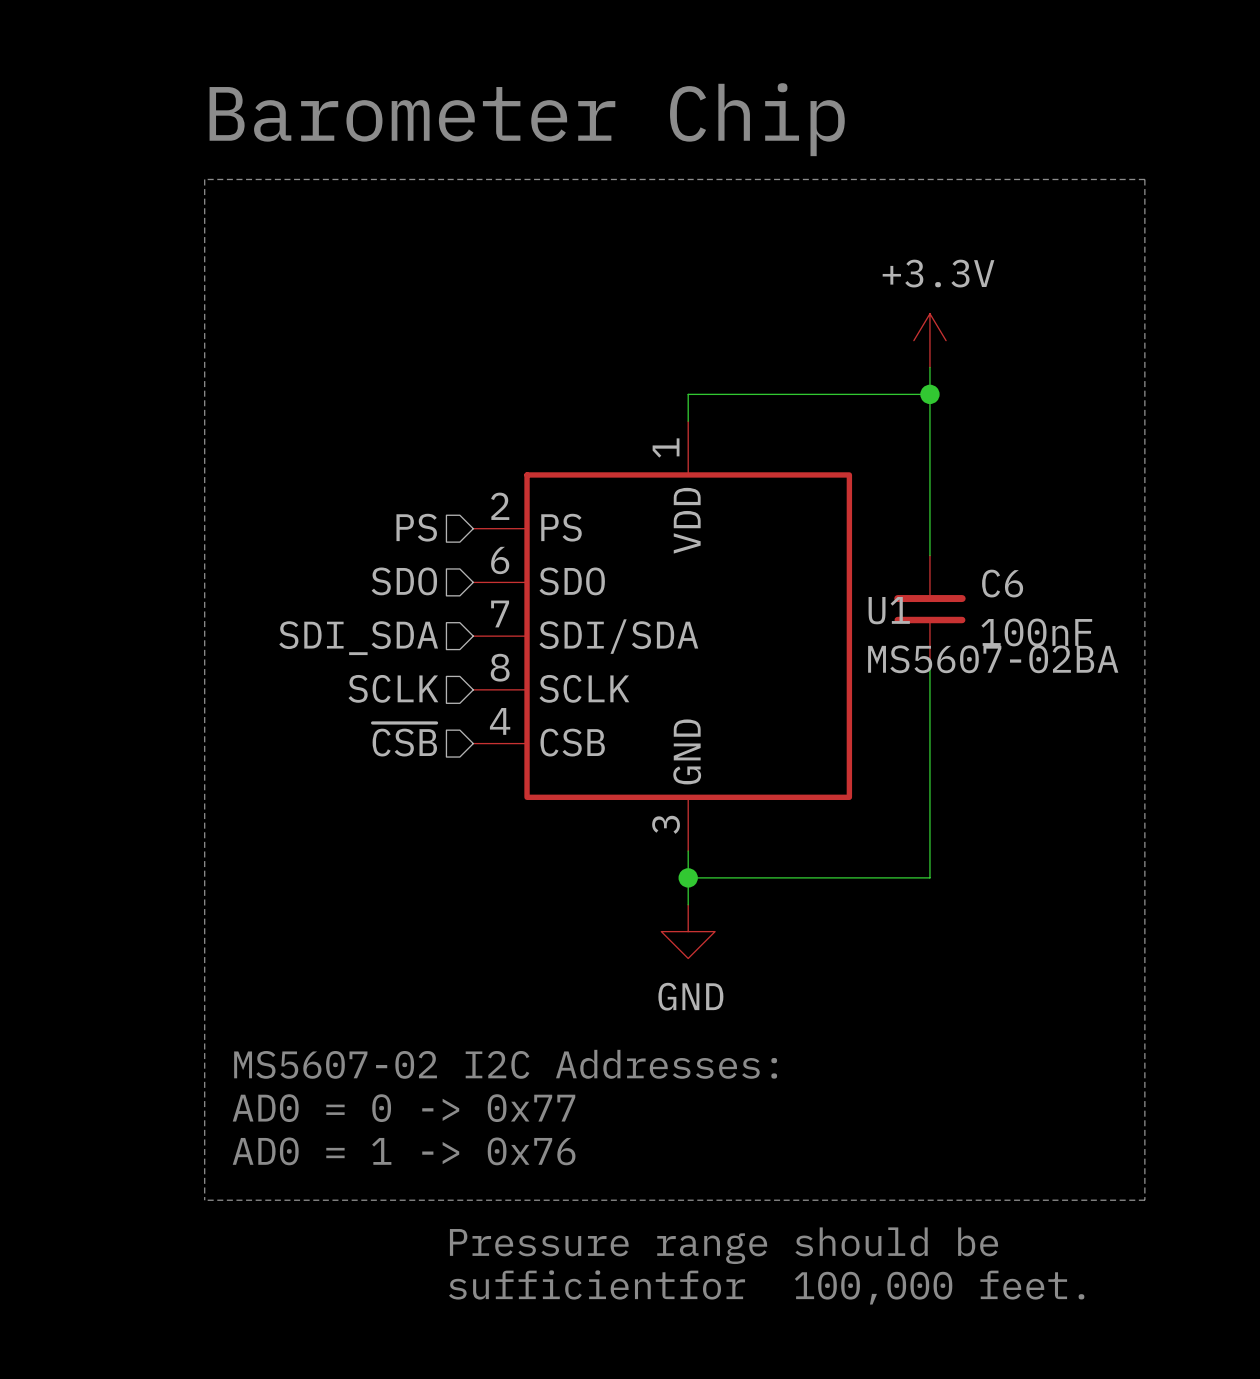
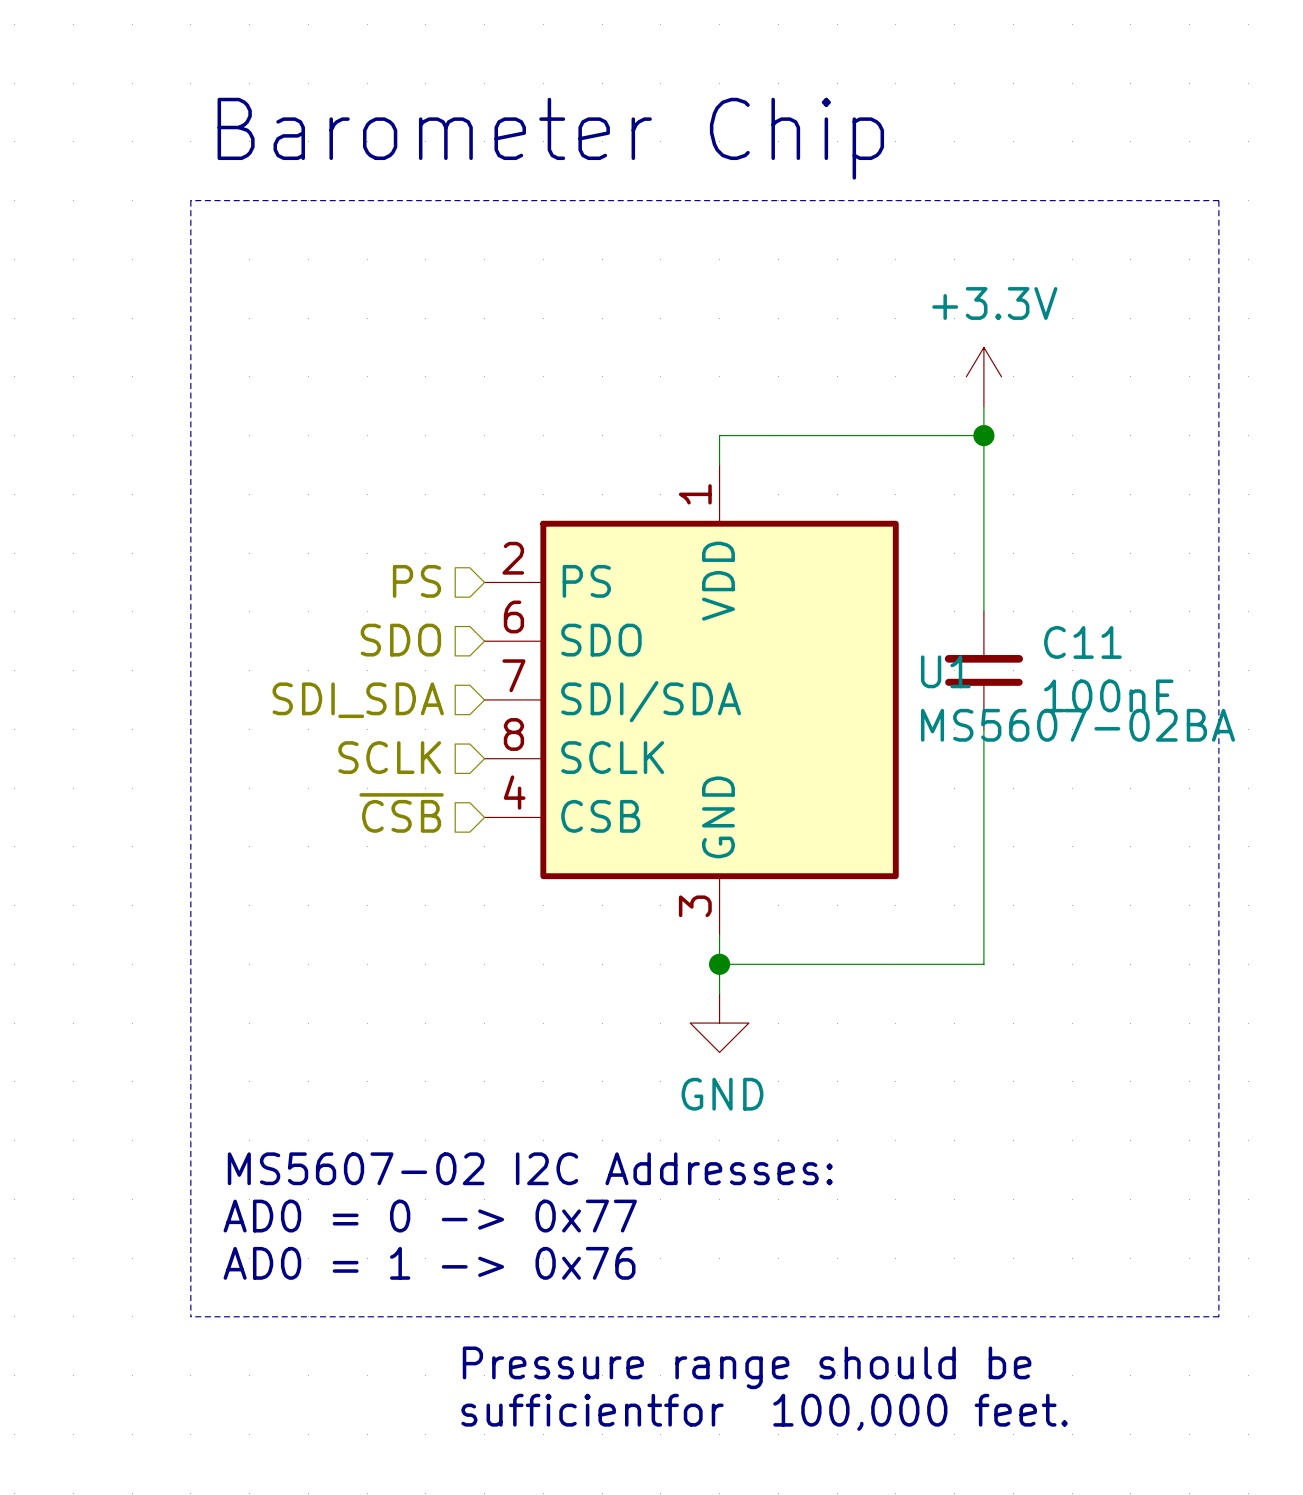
C6 name: C6 (1002, 583) -> C11 (1082, 642)

